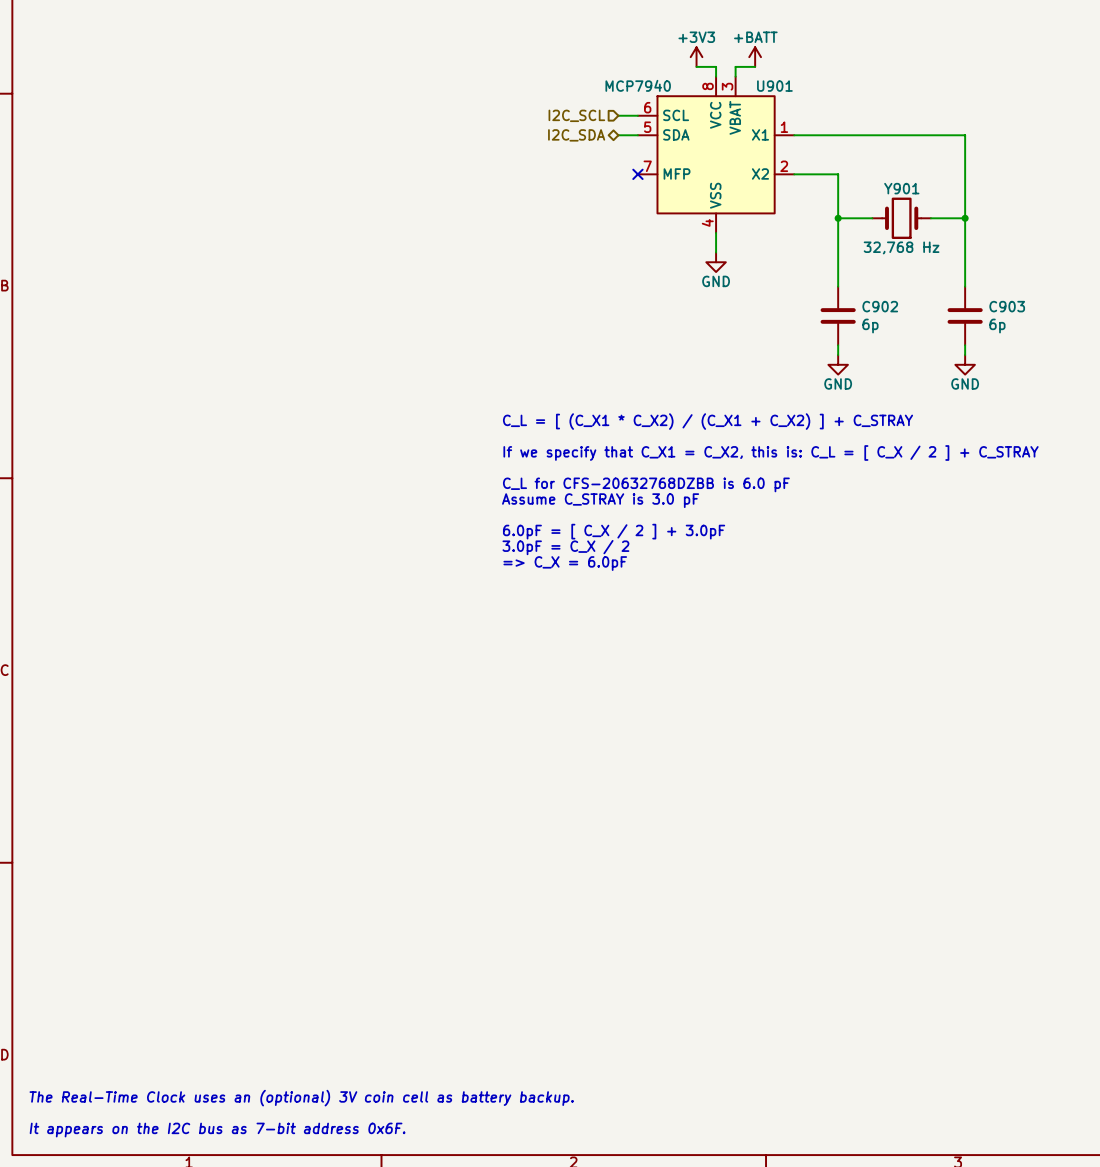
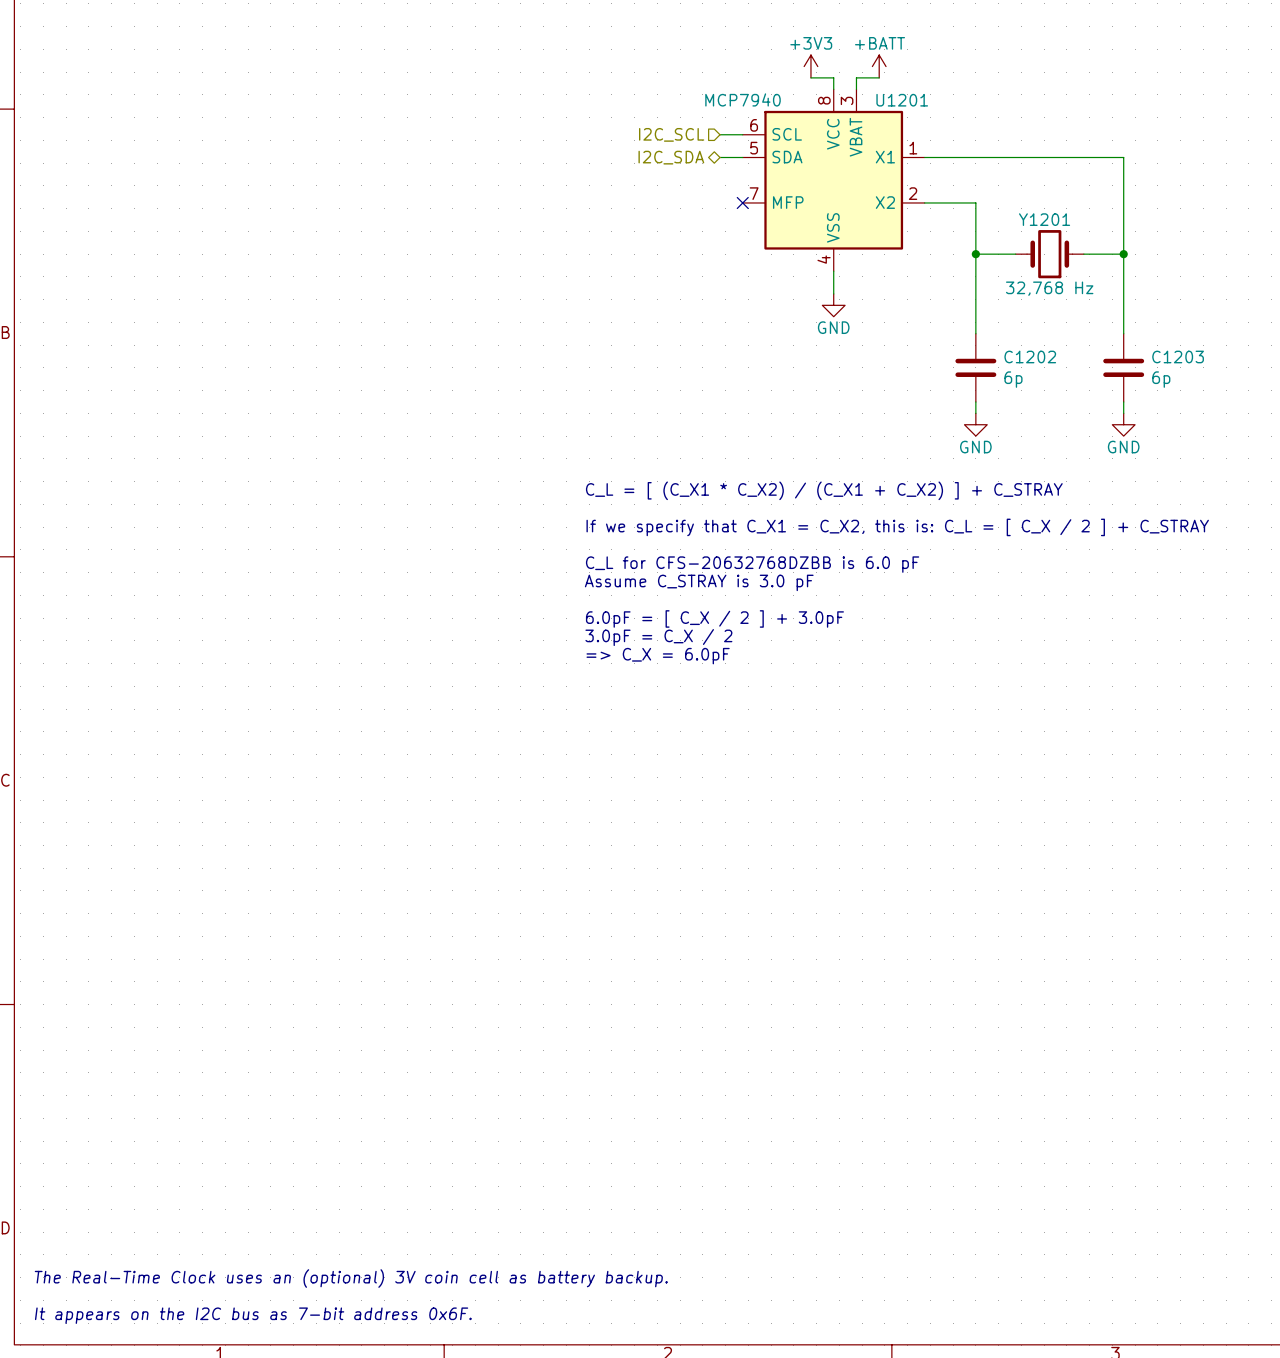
U901 name: U901 (774, 86) -> U1201 (902, 100)
Y901 name: Y901 (901, 188) -> Y1201 (1044, 219)
C902 name: C902 (880, 306) -> C1202 (1030, 356)
C903 name: C903 (1007, 306) -> C1203 (1178, 356)

